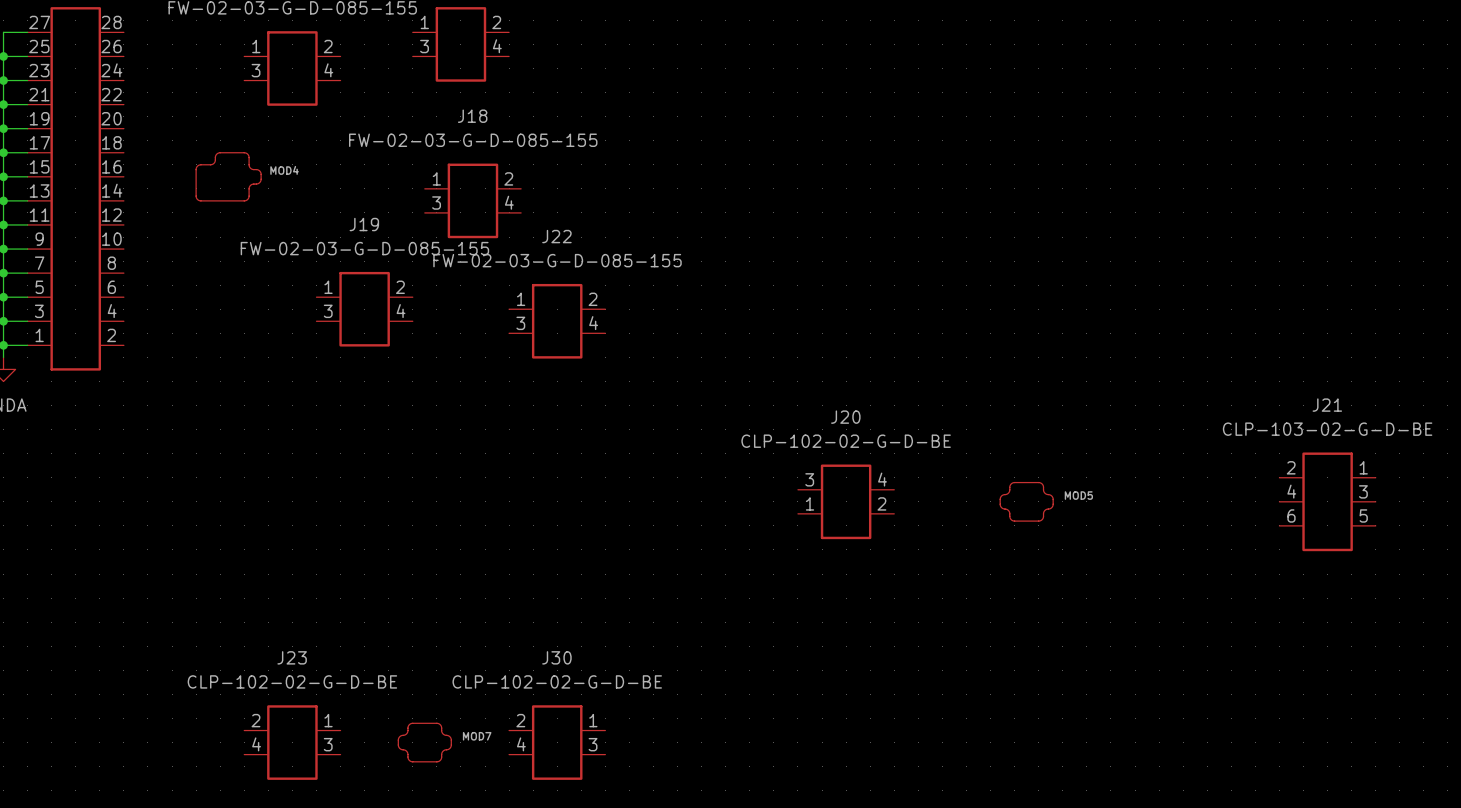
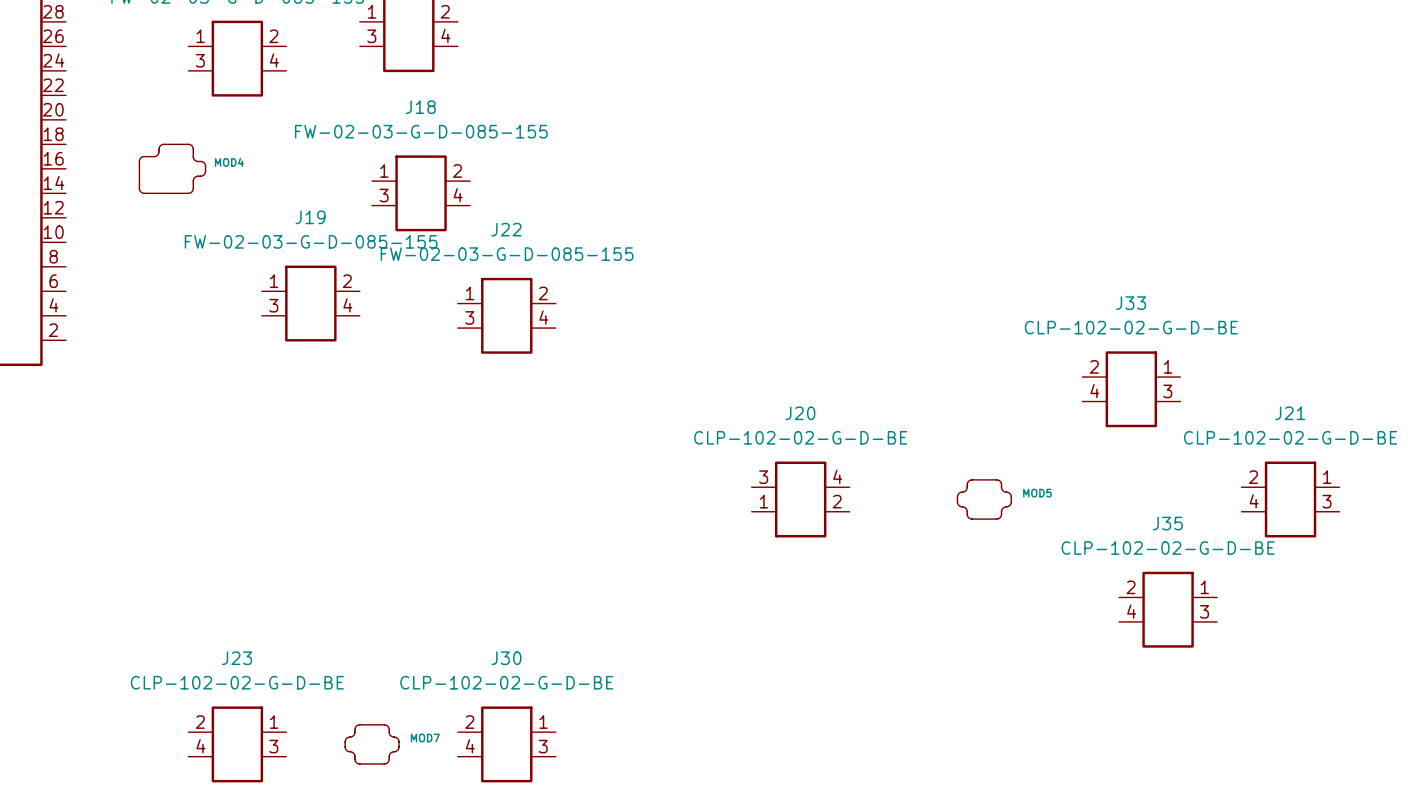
J33: none -> CLP-102-02-G-D-BE (1131, 389)
J21 value: CLP-103-02-G-D-BE (1327, 429) -> CLP-102-02-G-D-BE (1290, 437)
J21 symbol: [1279, 452, 1376, 552] -> [1241, 461, 1340, 538]
J35: none -> CLP-102-02-G-D-BE (1168, 609)

